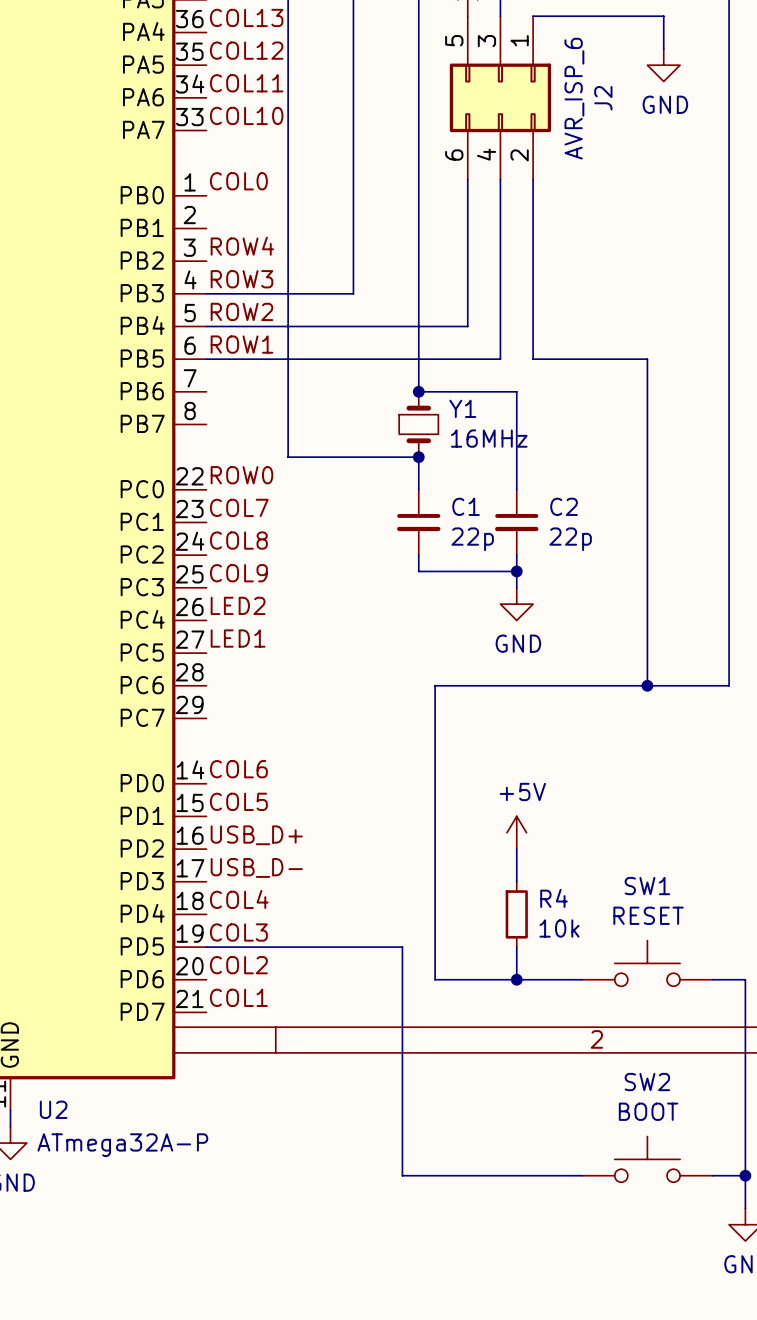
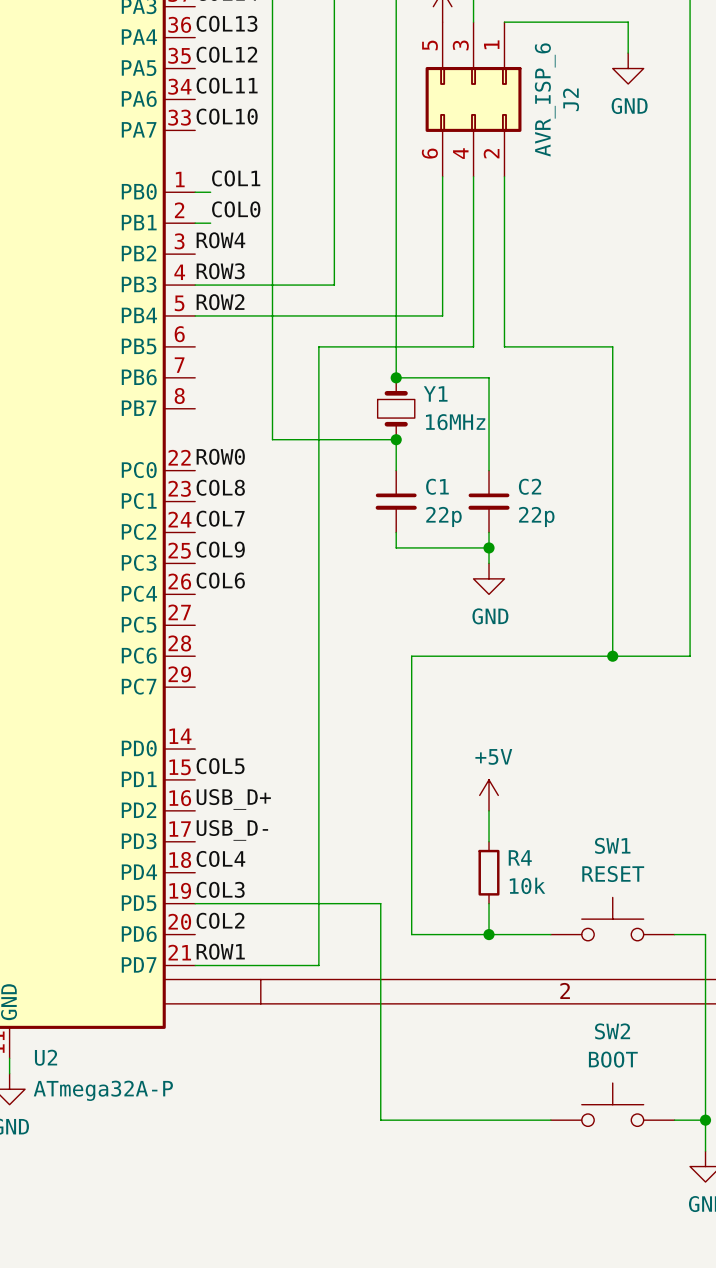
label position: COL0 (238, 181) -> COL0 (236, 209)
label: none -> COL1 (236, 178)
wire: none -> (195, 192) (210, 192)
wire: none -> (195, 223) (210, 223)
label: ROW1 (241, 344) -> none
wire: (206, 359) (337, 359) -> (195, 965) (318, 965) (318, 346)
label: COL7 (239, 507) -> COL8 (220, 487)
label: COL8 (238, 540) -> COL7 (220, 518)
label: LED2 (238, 605) -> COL6 (220, 580)
label: LED1 (238, 638) -> none
label: COL6 (238, 769) -> none
label: COL1 (238, 997) -> ROW1 (220, 951)

